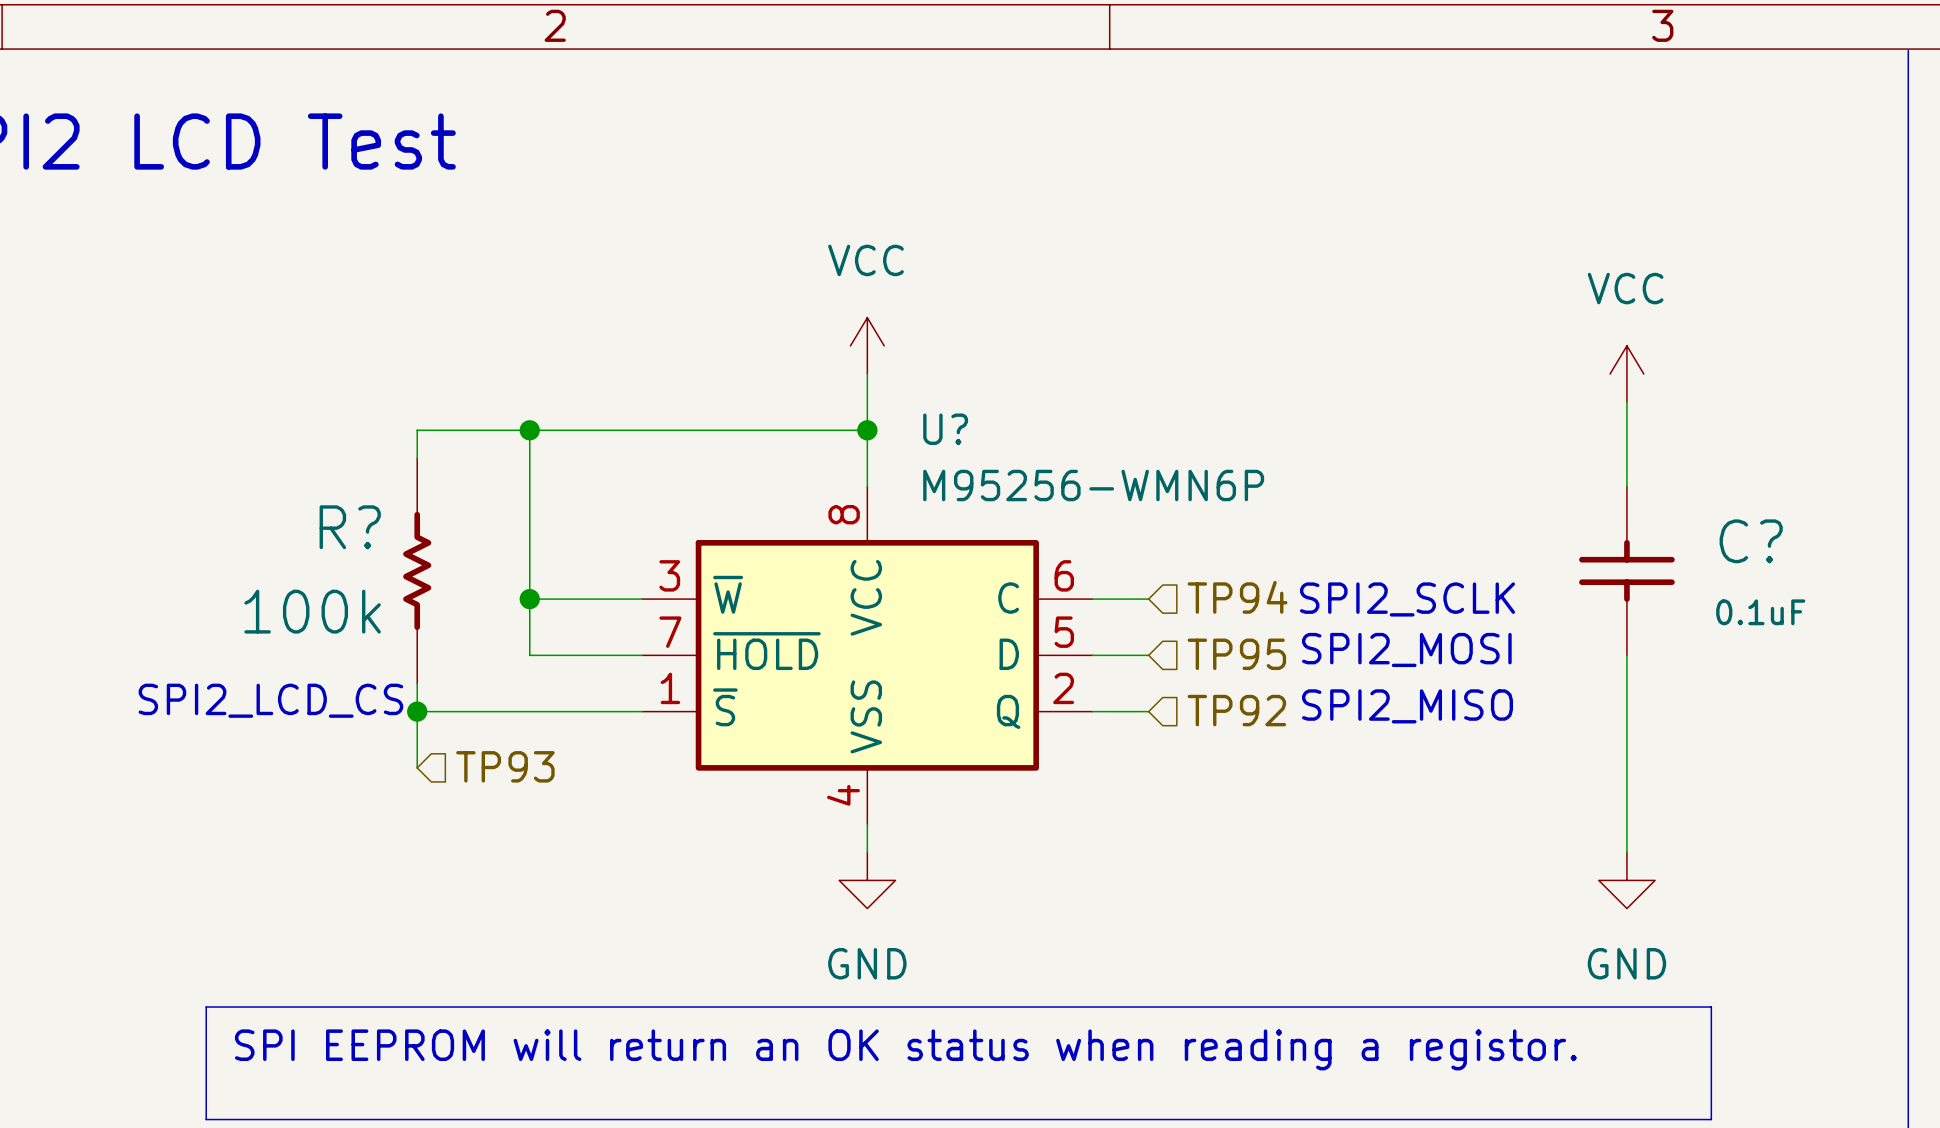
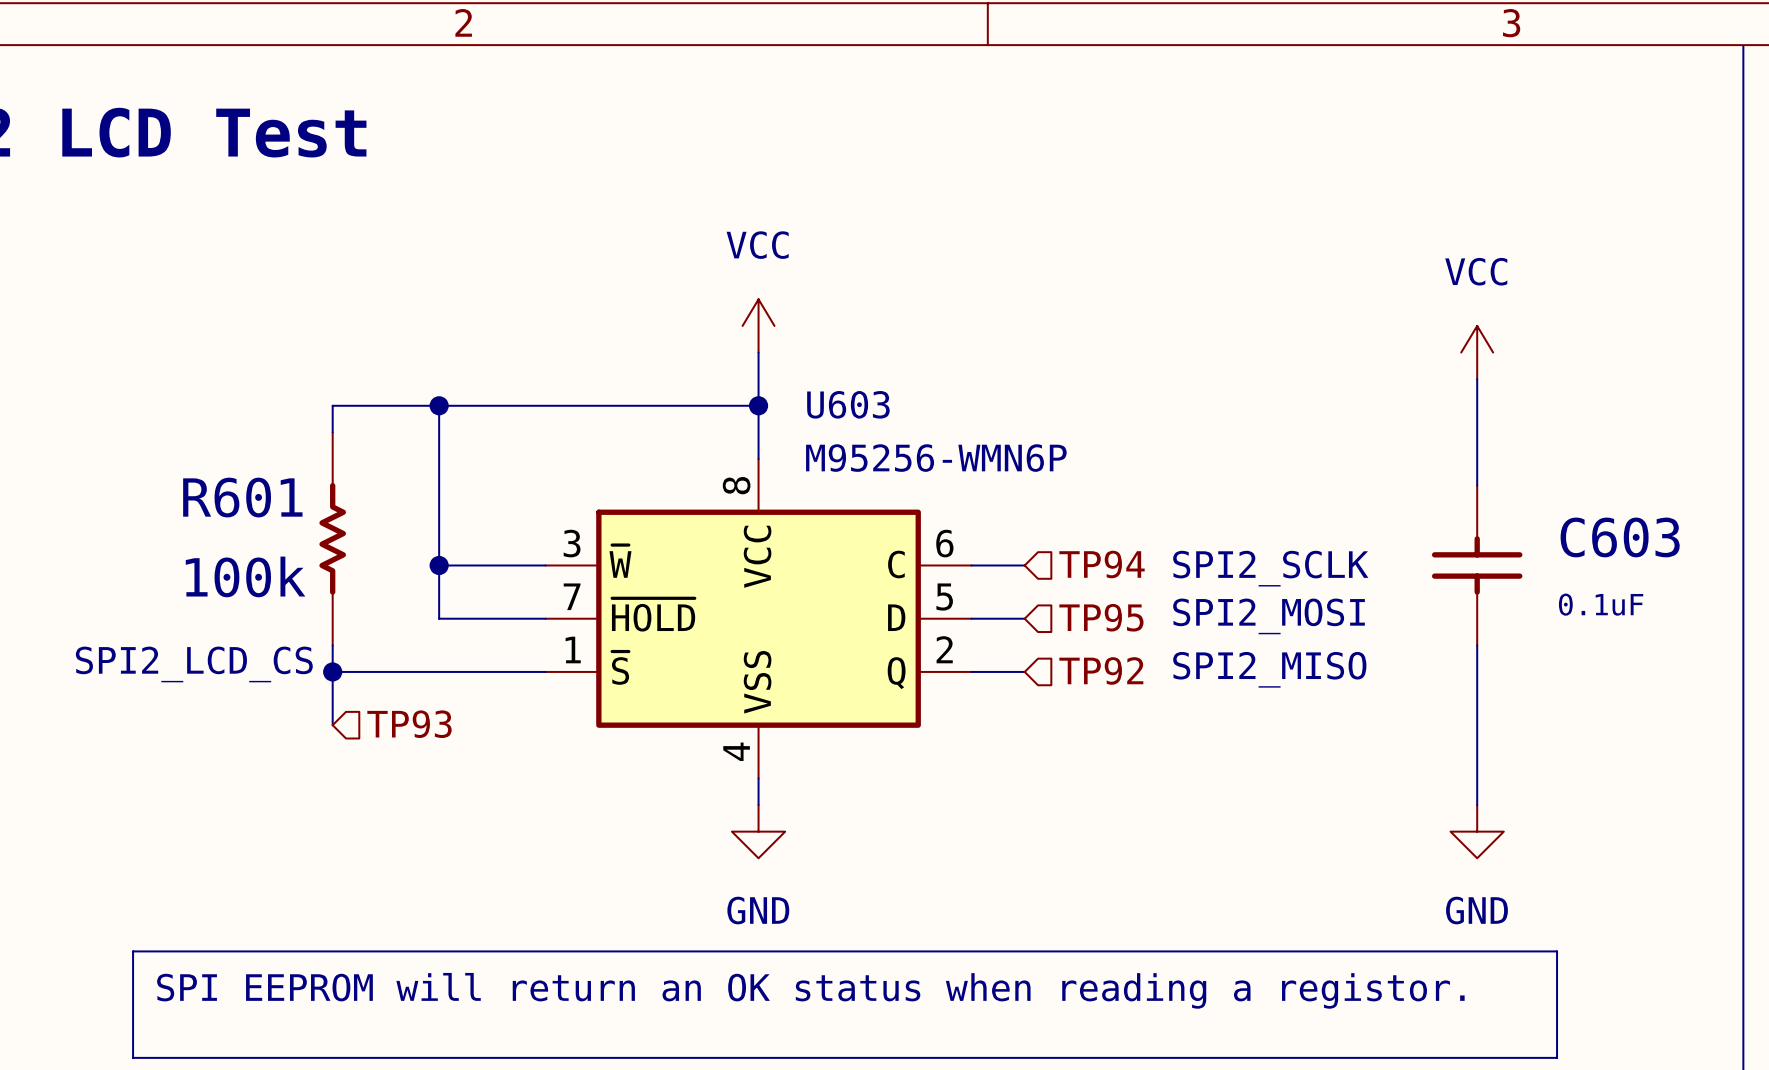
U? name: U? (945, 429) -> U603 (848, 404)
R? name: R? (350, 527) -> R601 (242, 497)
C?: (1626, 570) -> none
C603: none -> (1477, 565)

